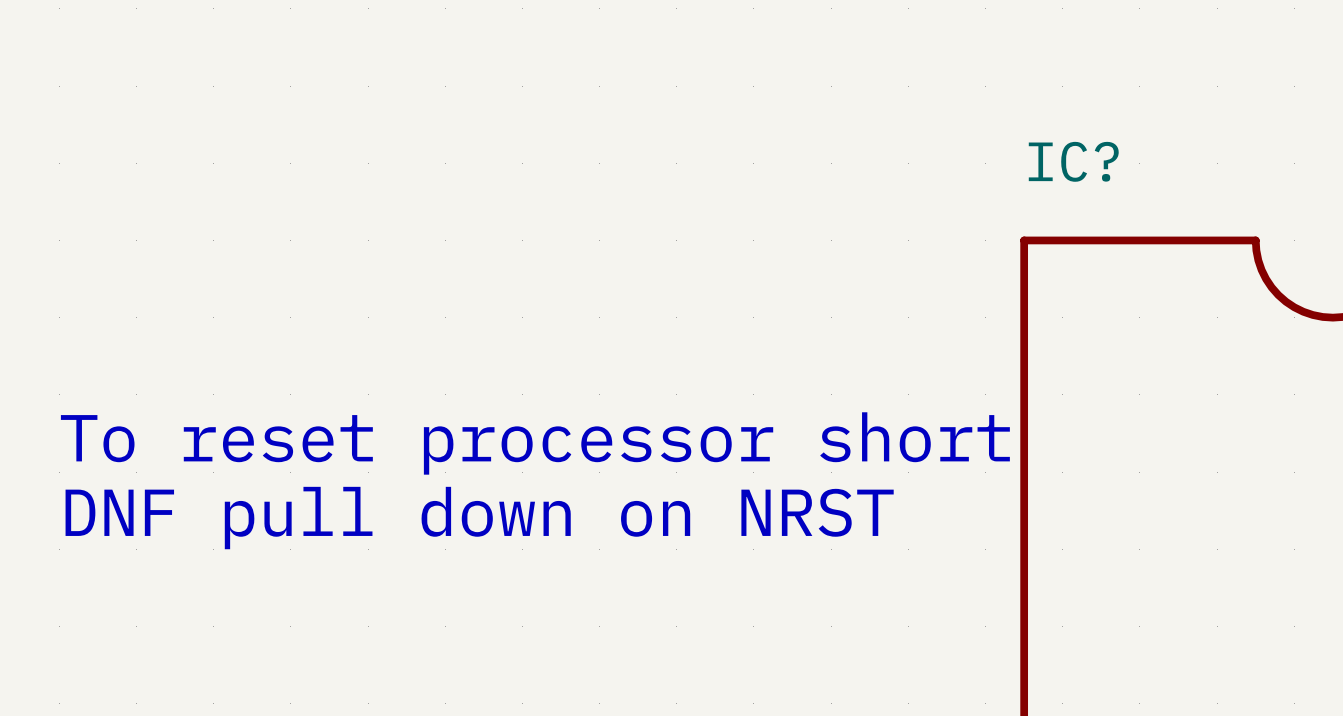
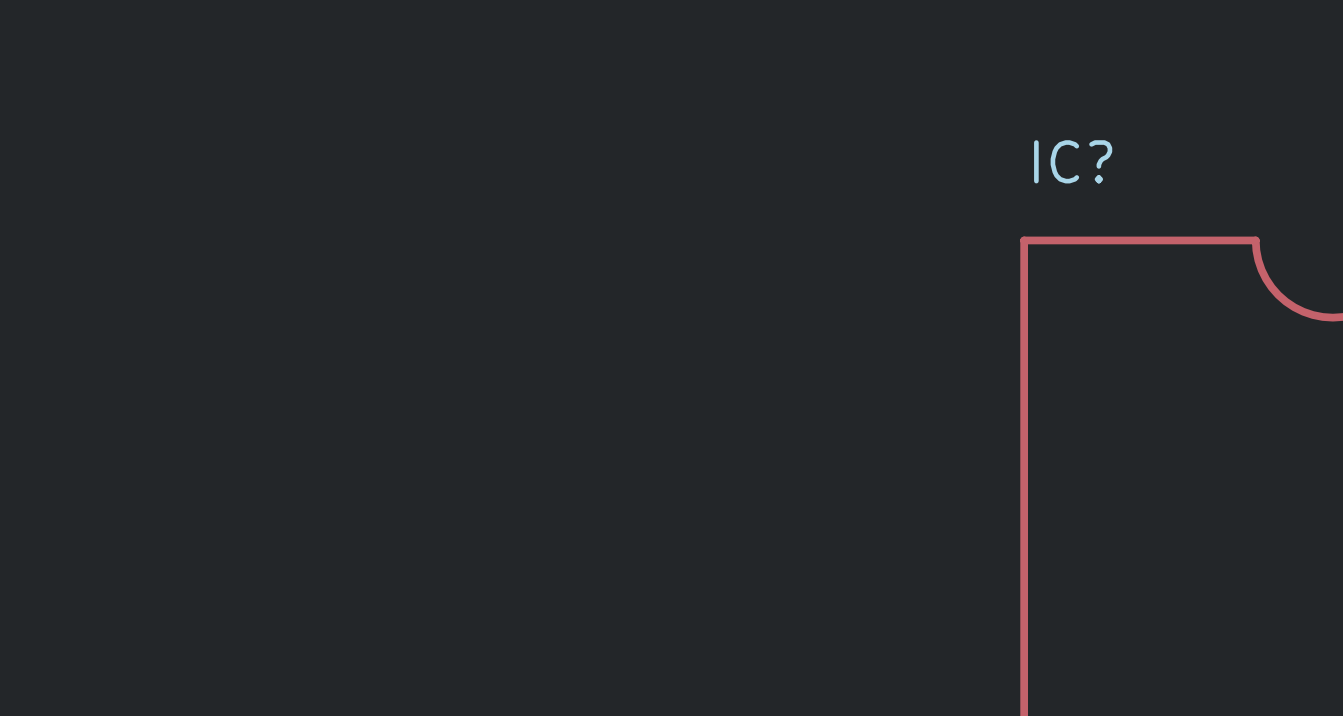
text: To reset processor short (535, 443) -> none
text: DNF pull down on NRST (479, 518) -> none

